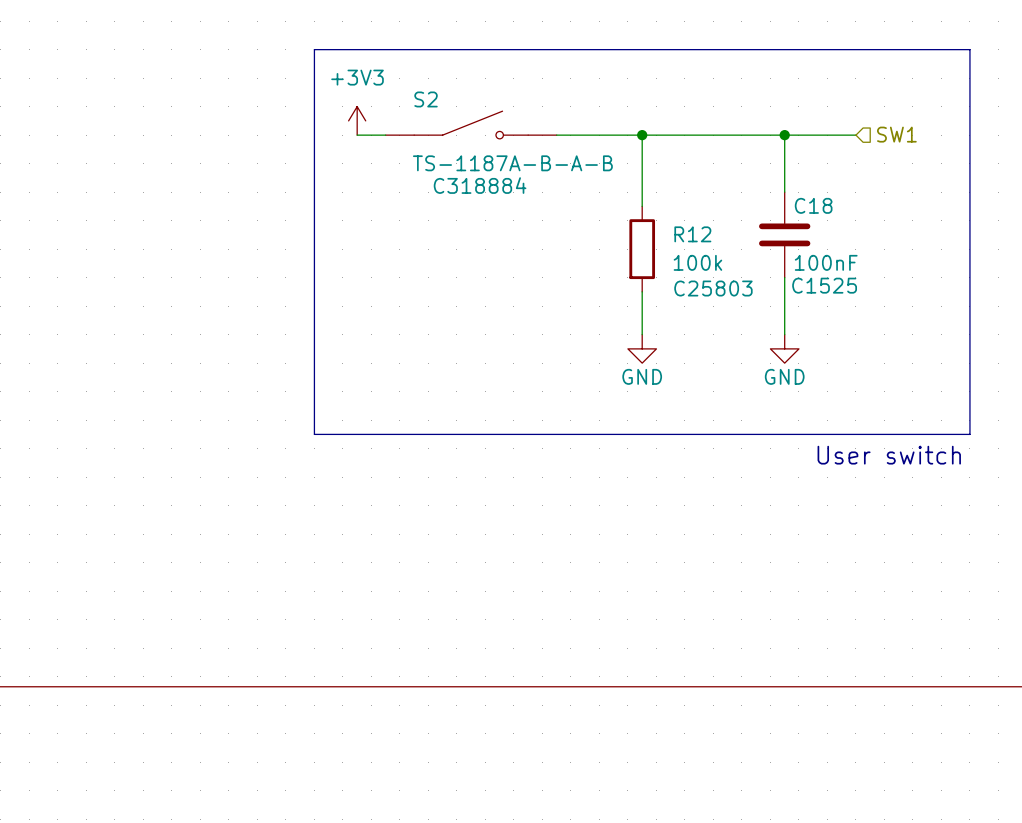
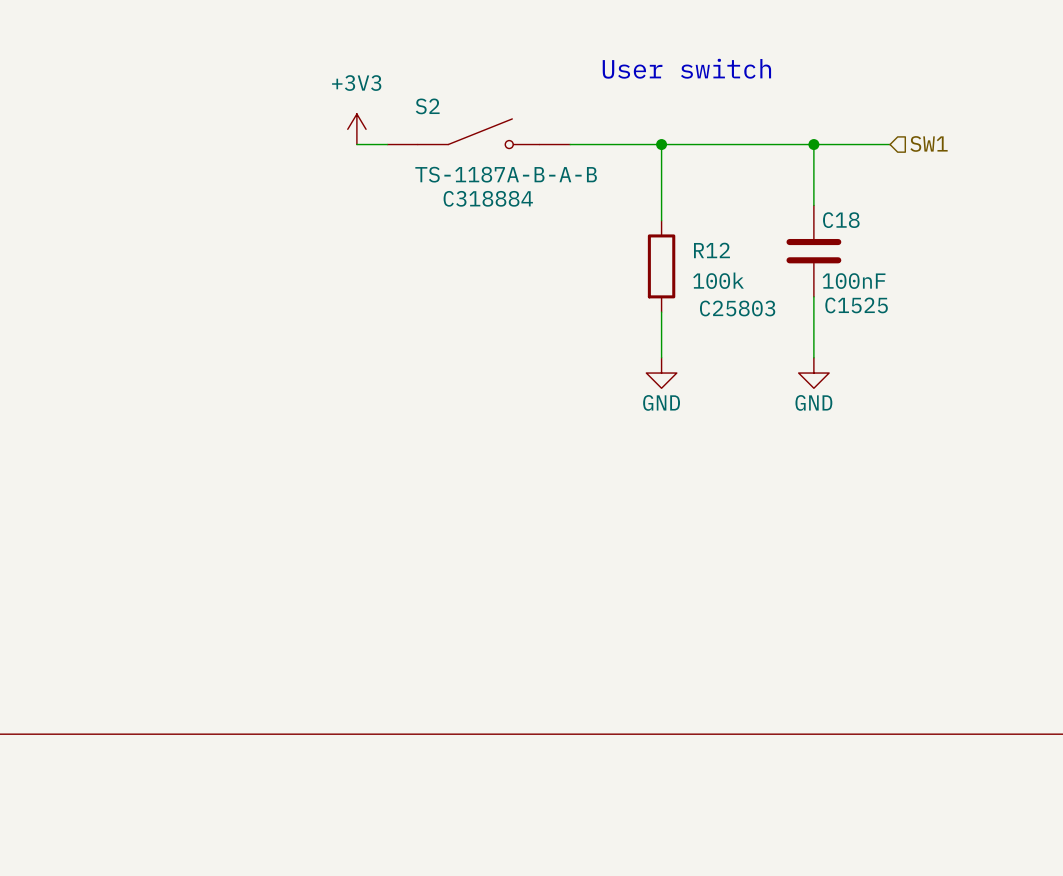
line: (314, 49) (969, 49) (969, 434) (314, 434) (314, 49) -> none
text: none -> User switch (686, 68)
text: User switch (889, 455) -> none

